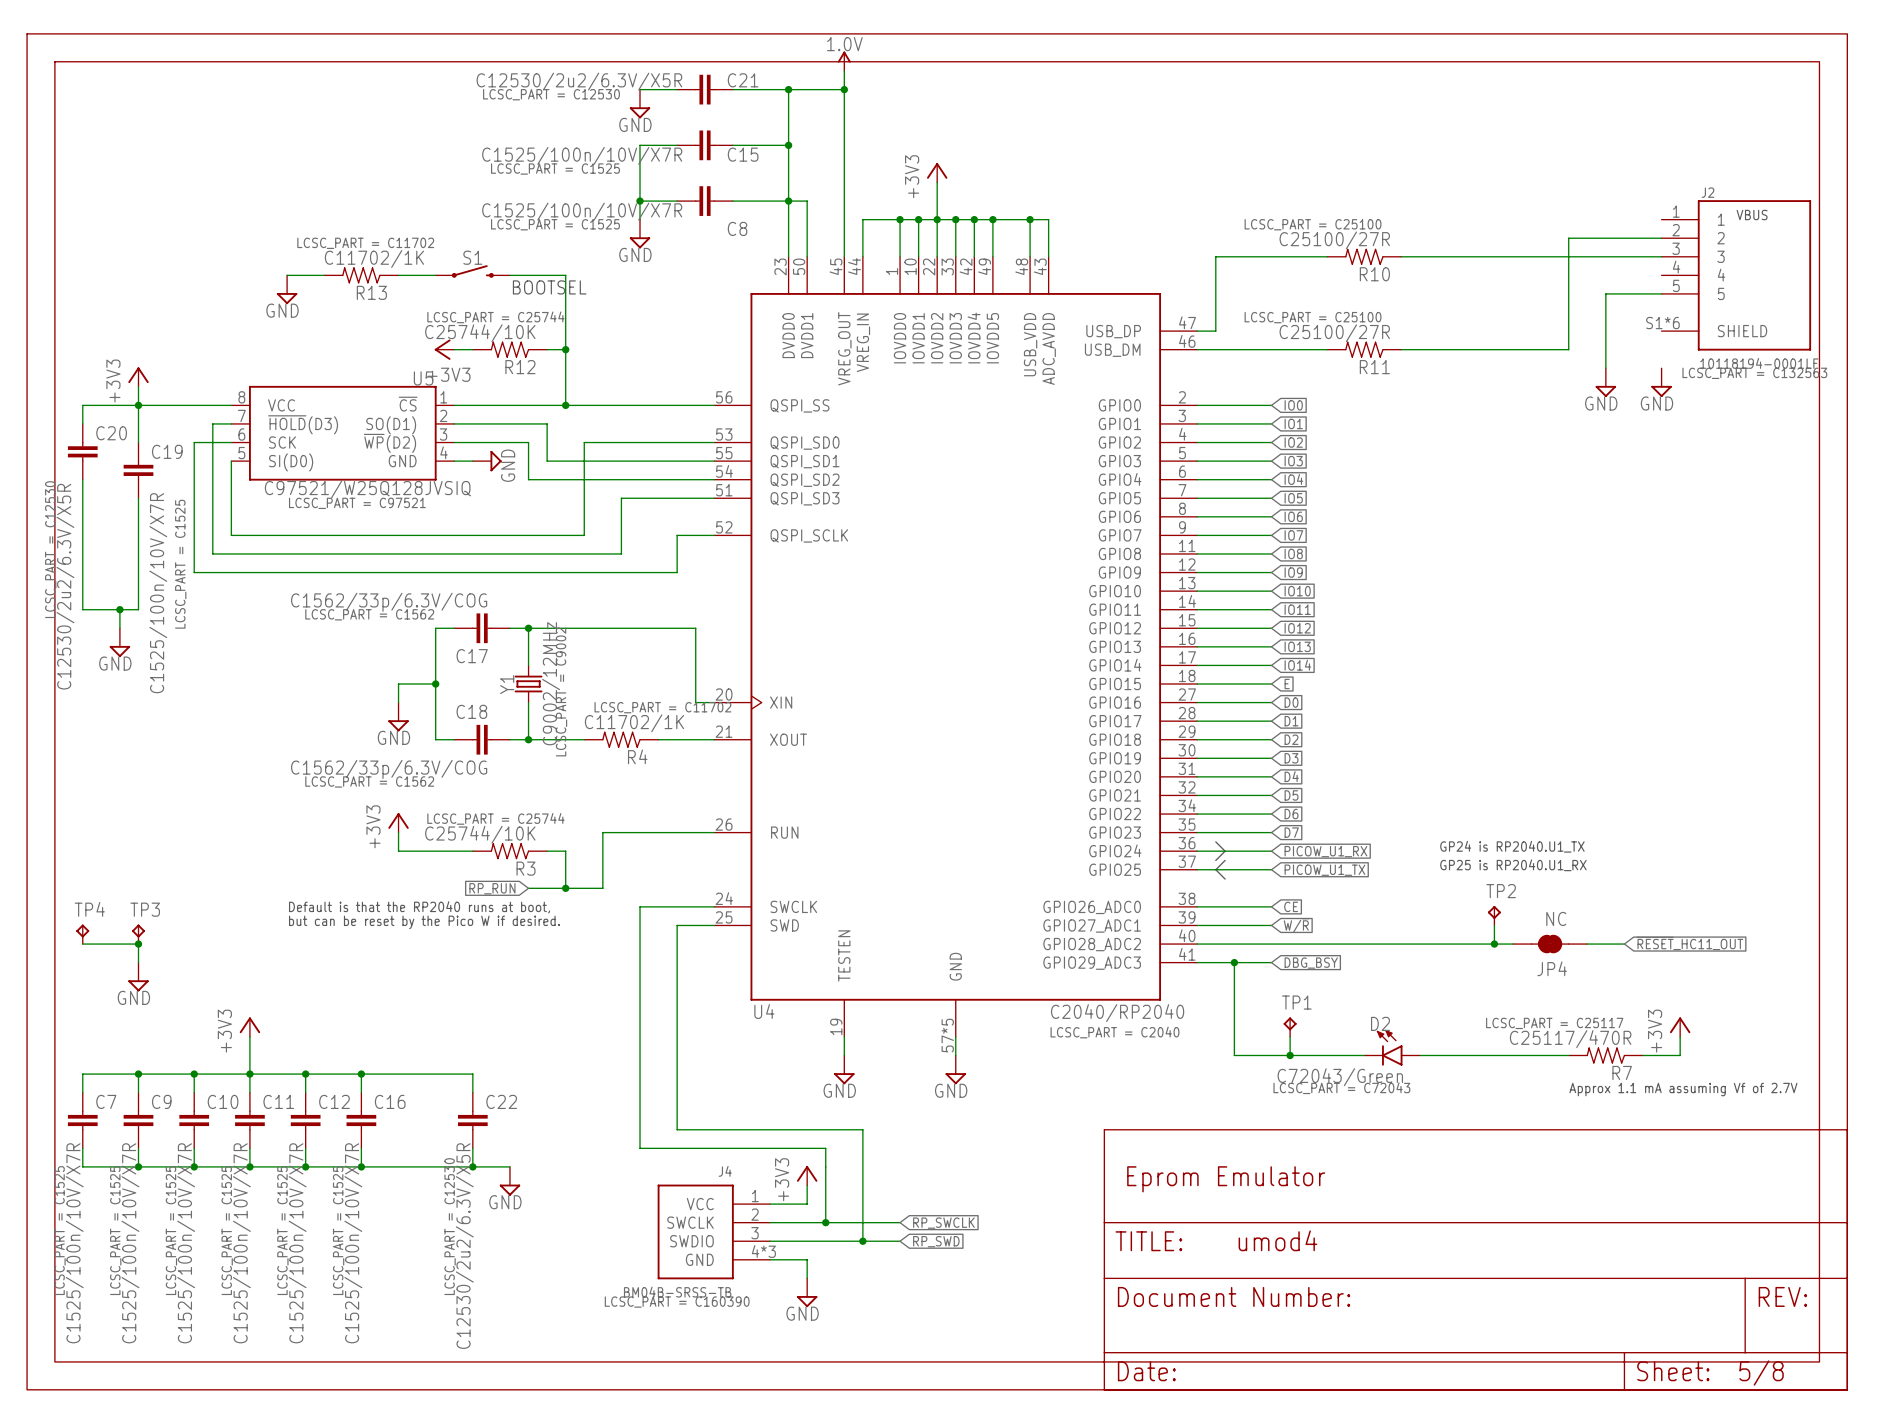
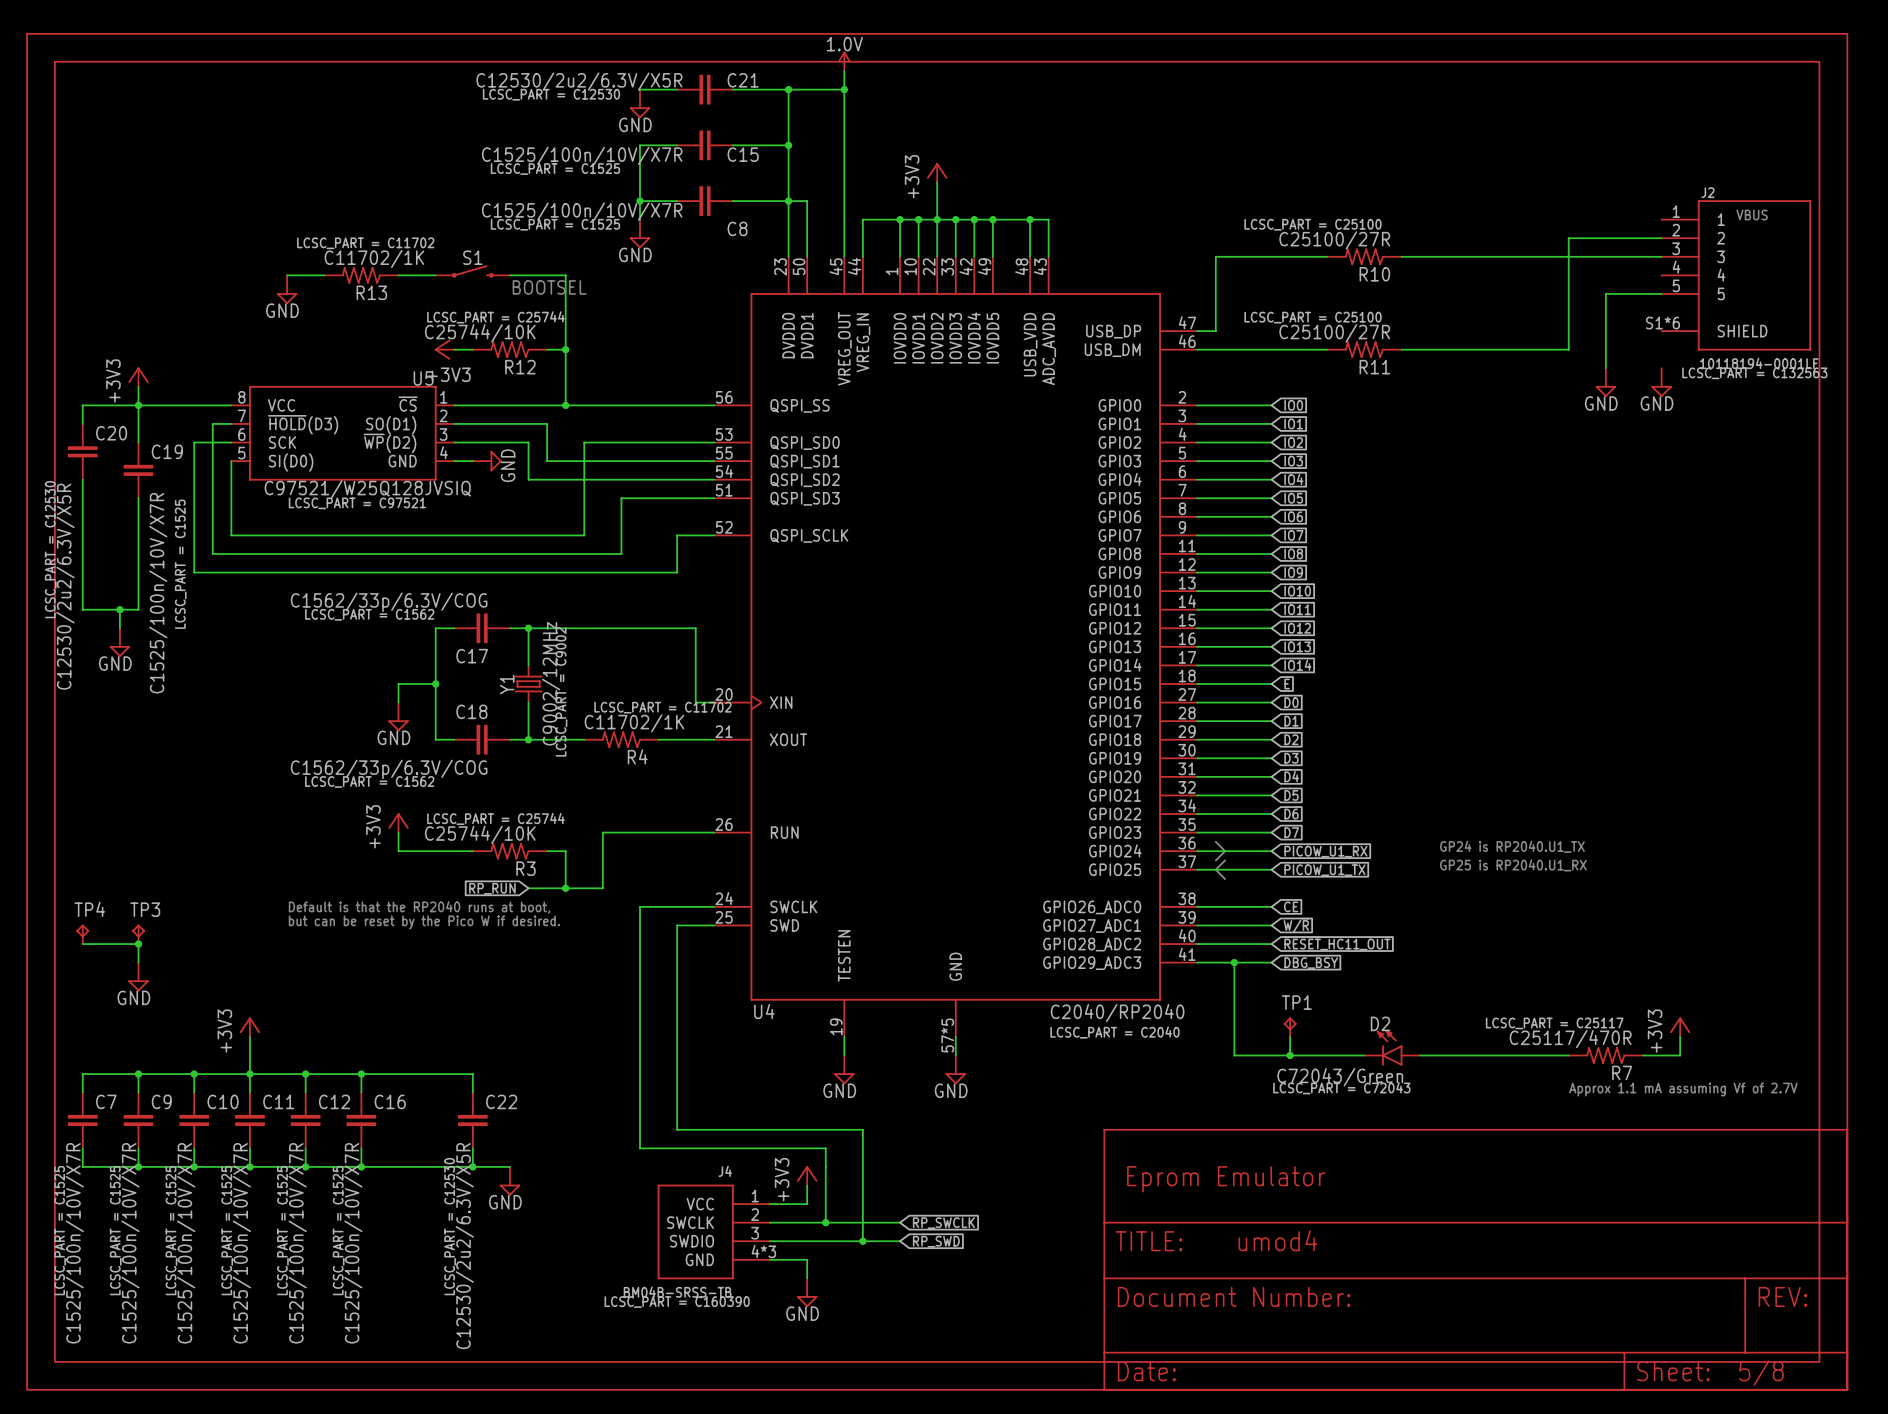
TP2: (1494, 915) -> none
wire: (1494, 925) (1494, 944) -> none
global label: none -> ~{RESET}_HC11_OUT (1336, 943)
global label: ~{RESET}_HC11_OUT (1689, 943) -> none
wire: (1271, 944) (1512, 944) -> none
junction: (1494, 944) -> none
JP4: NC (1550, 944) -> none
wire: (1587, 944) (1624, 944) -> none

